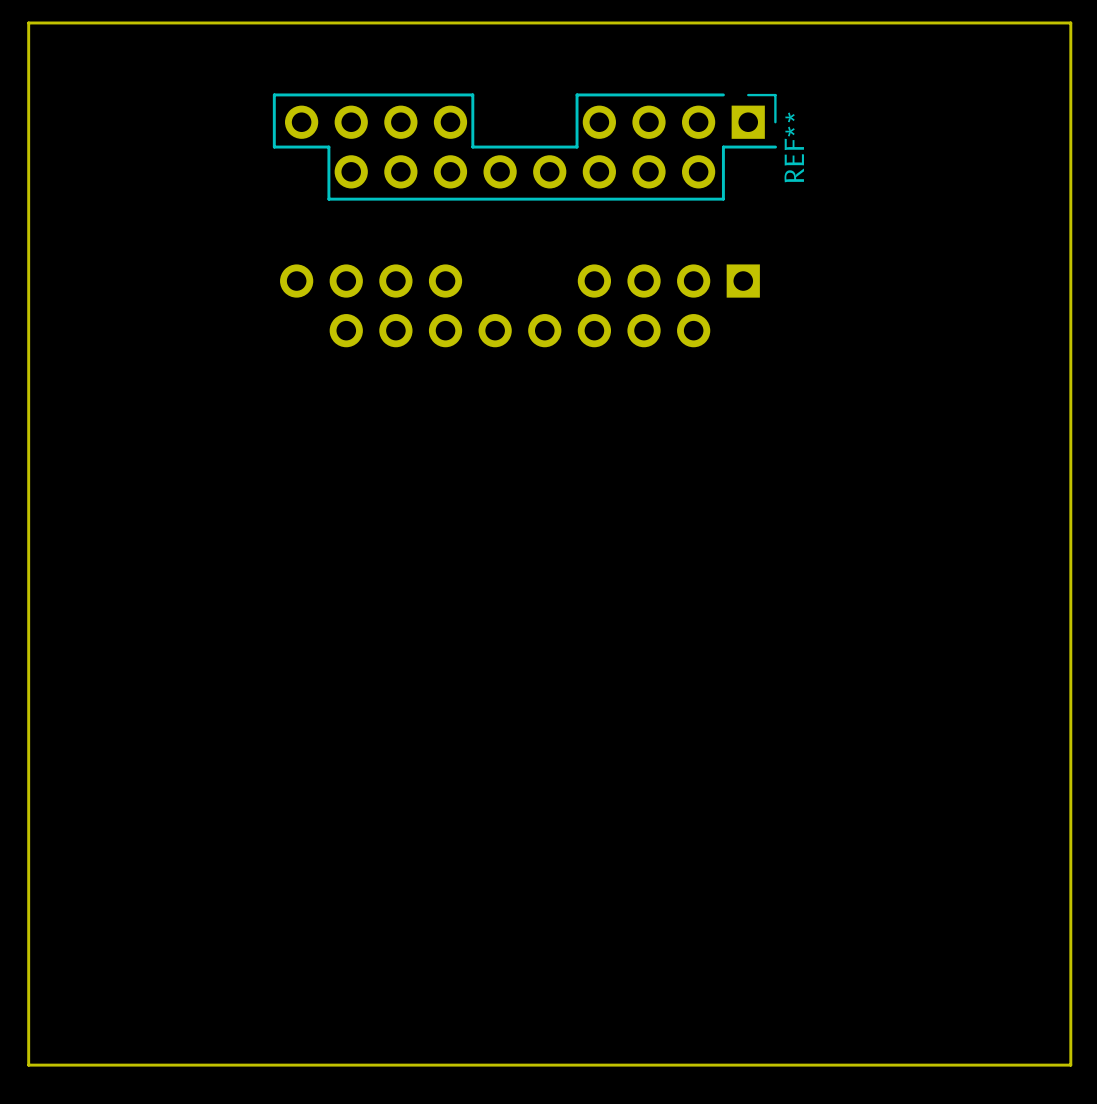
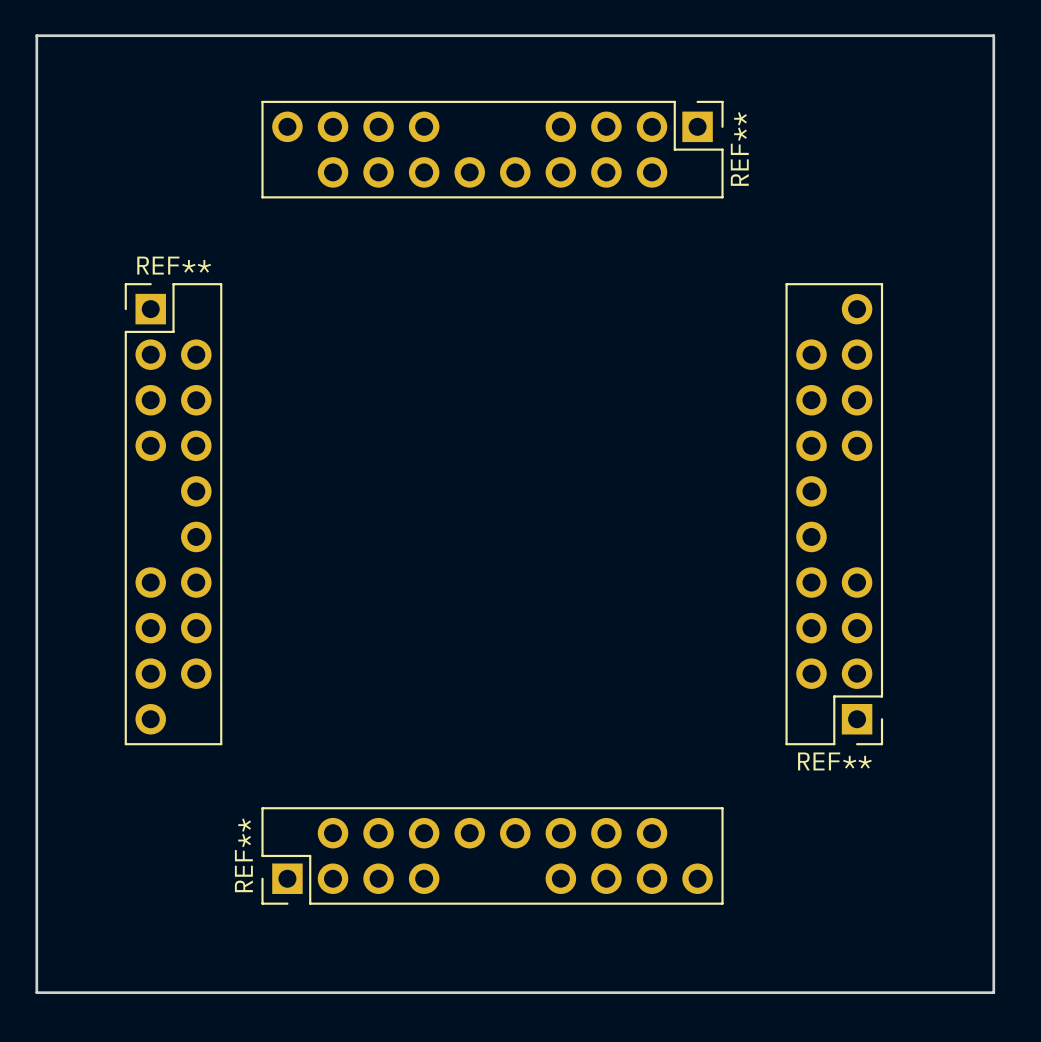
REF** footprint: [272, 93, 778, 201] -> [261, 100, 724, 199]
part: (519, 305) -> none
REF**: none -> (173, 514)
REF**: none -> (834, 514)
REF**: none -> (492, 855)

